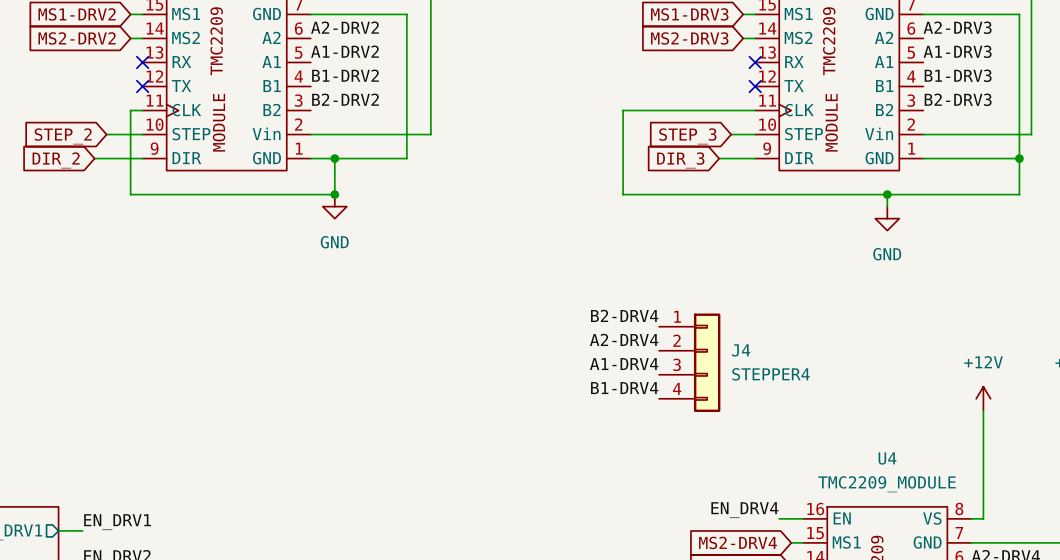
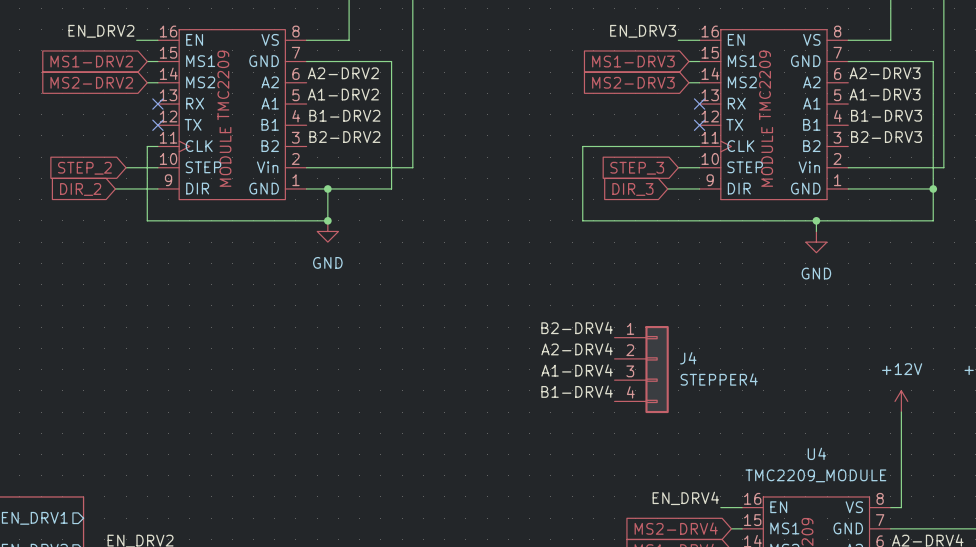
label: EN_DRV1 (117, 522) -> none
wire: (58, 530) (82, 530) -> none

